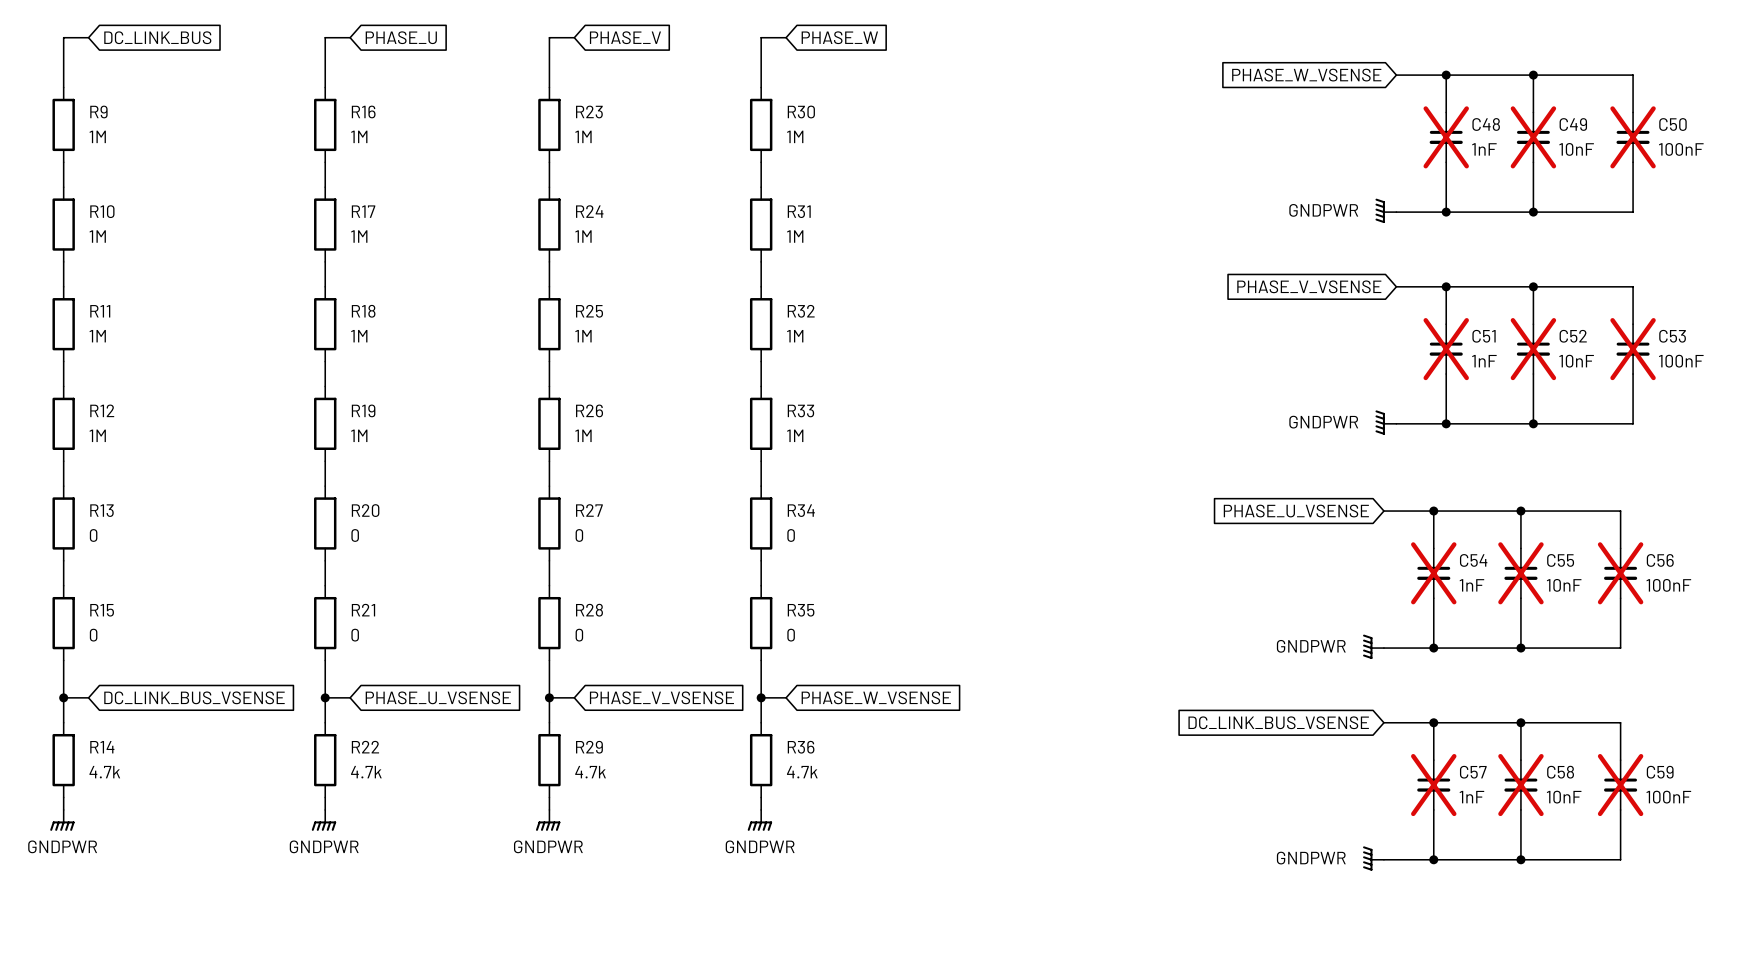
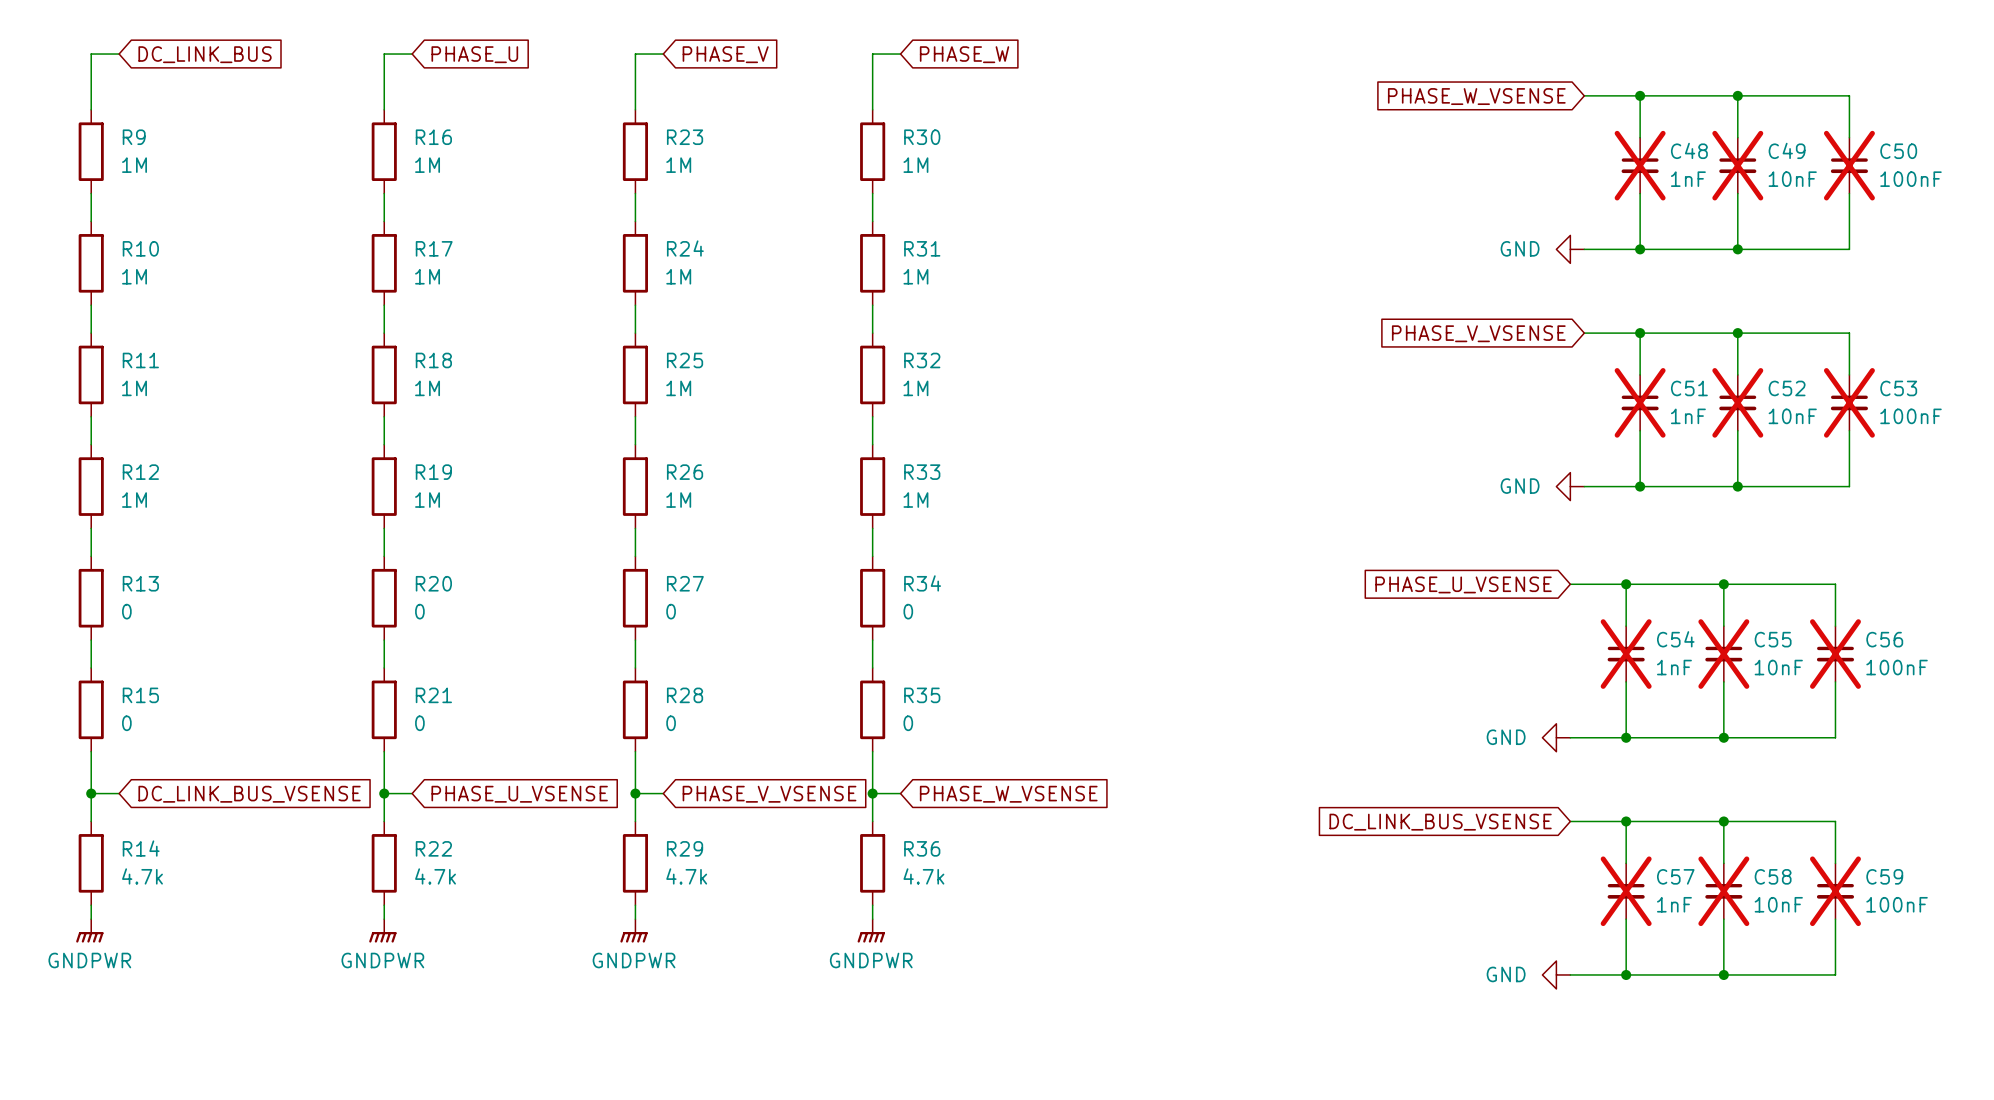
power symbol: GNDPWR (1385, 210) -> GND (1570, 249)
power symbol: GNDPWR (1385, 422) -> GND (1570, 486)
power symbol: GNDPWR (1373, 646) -> GND (1556, 737)
power symbol: GNDPWR (1373, 858) -> GND (1556, 974)

